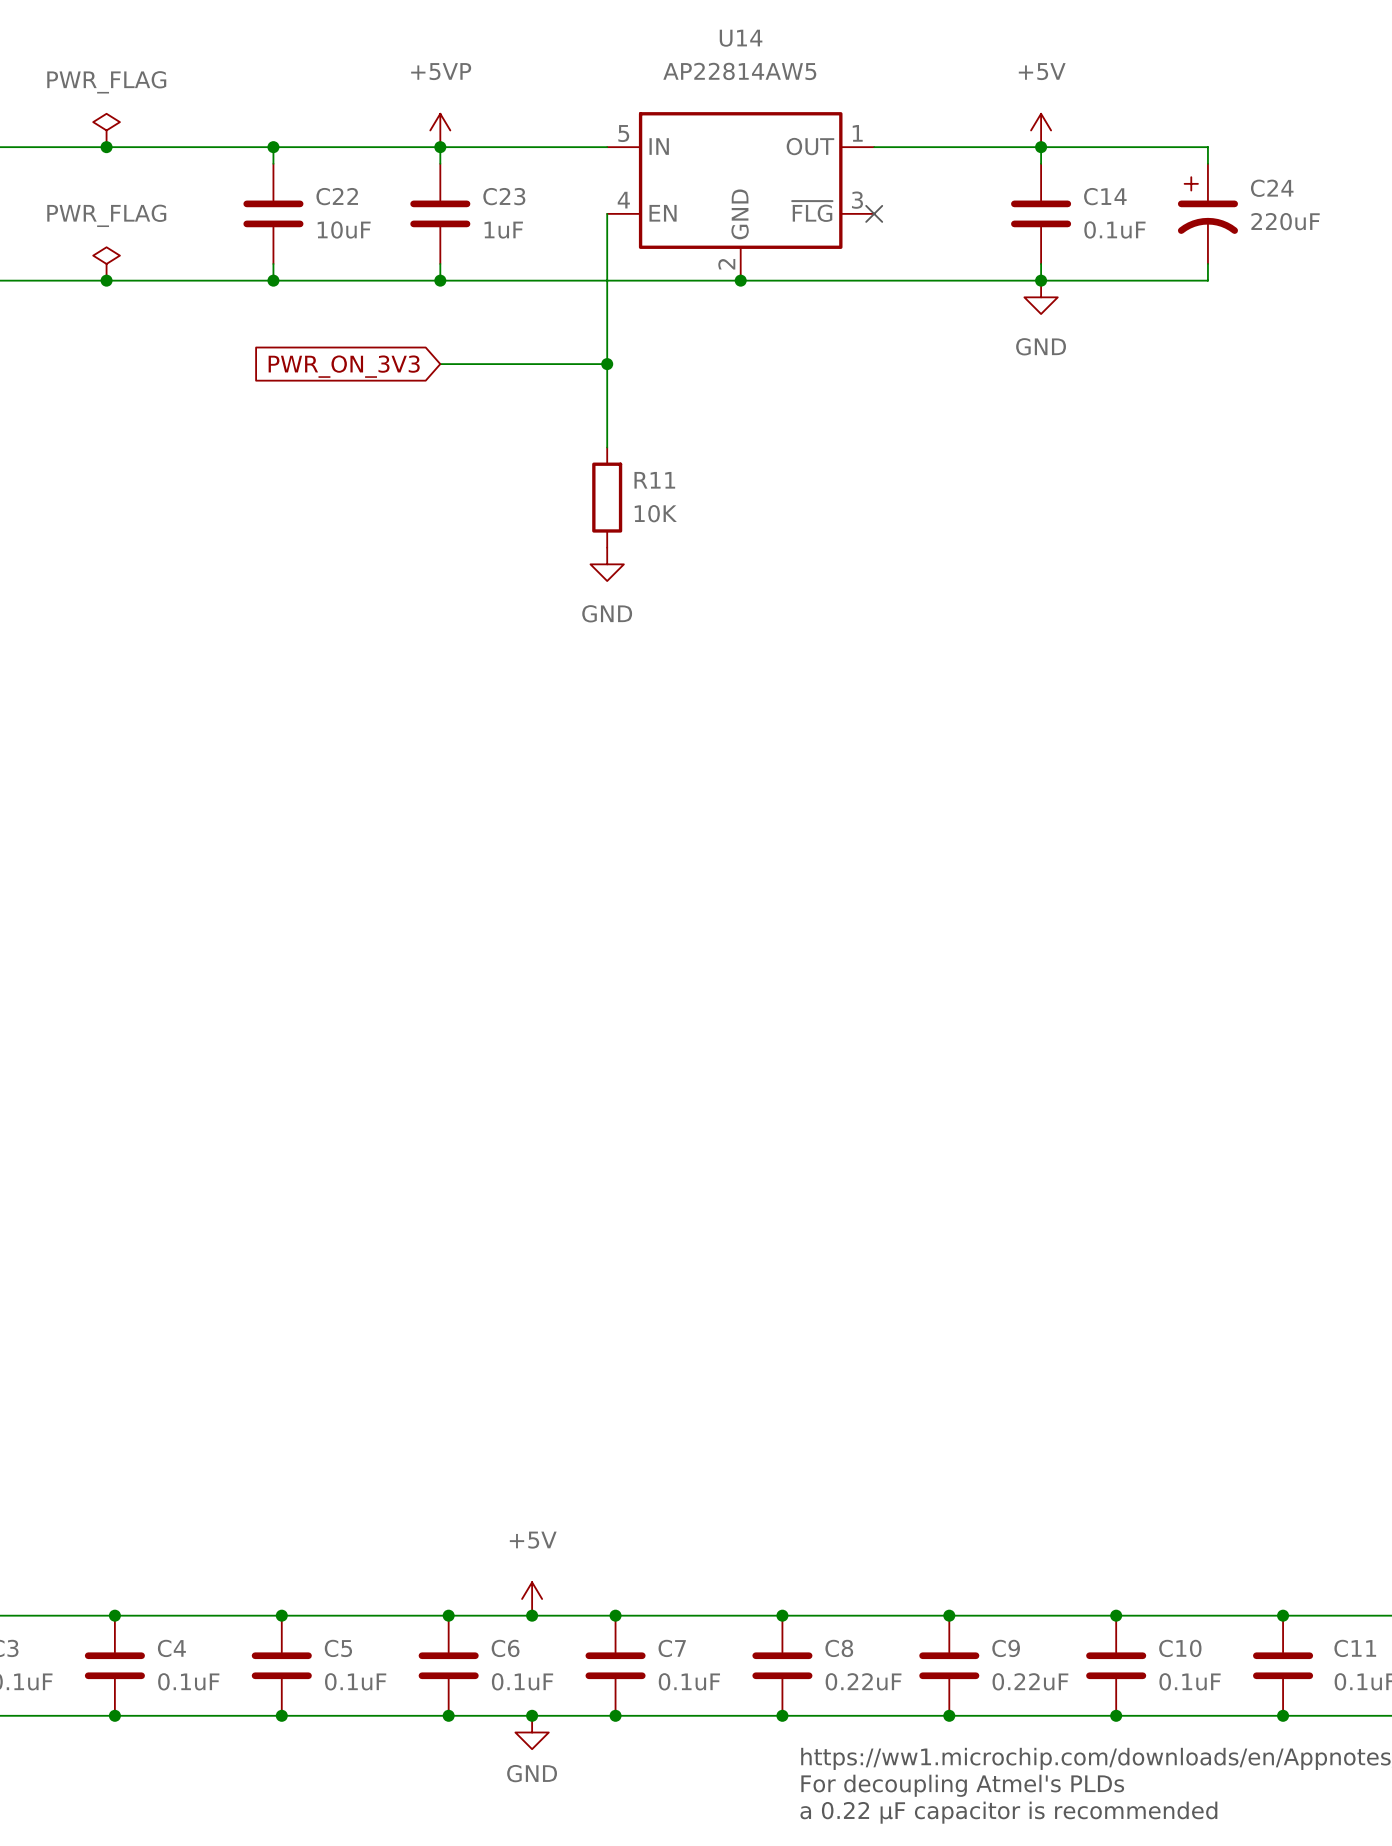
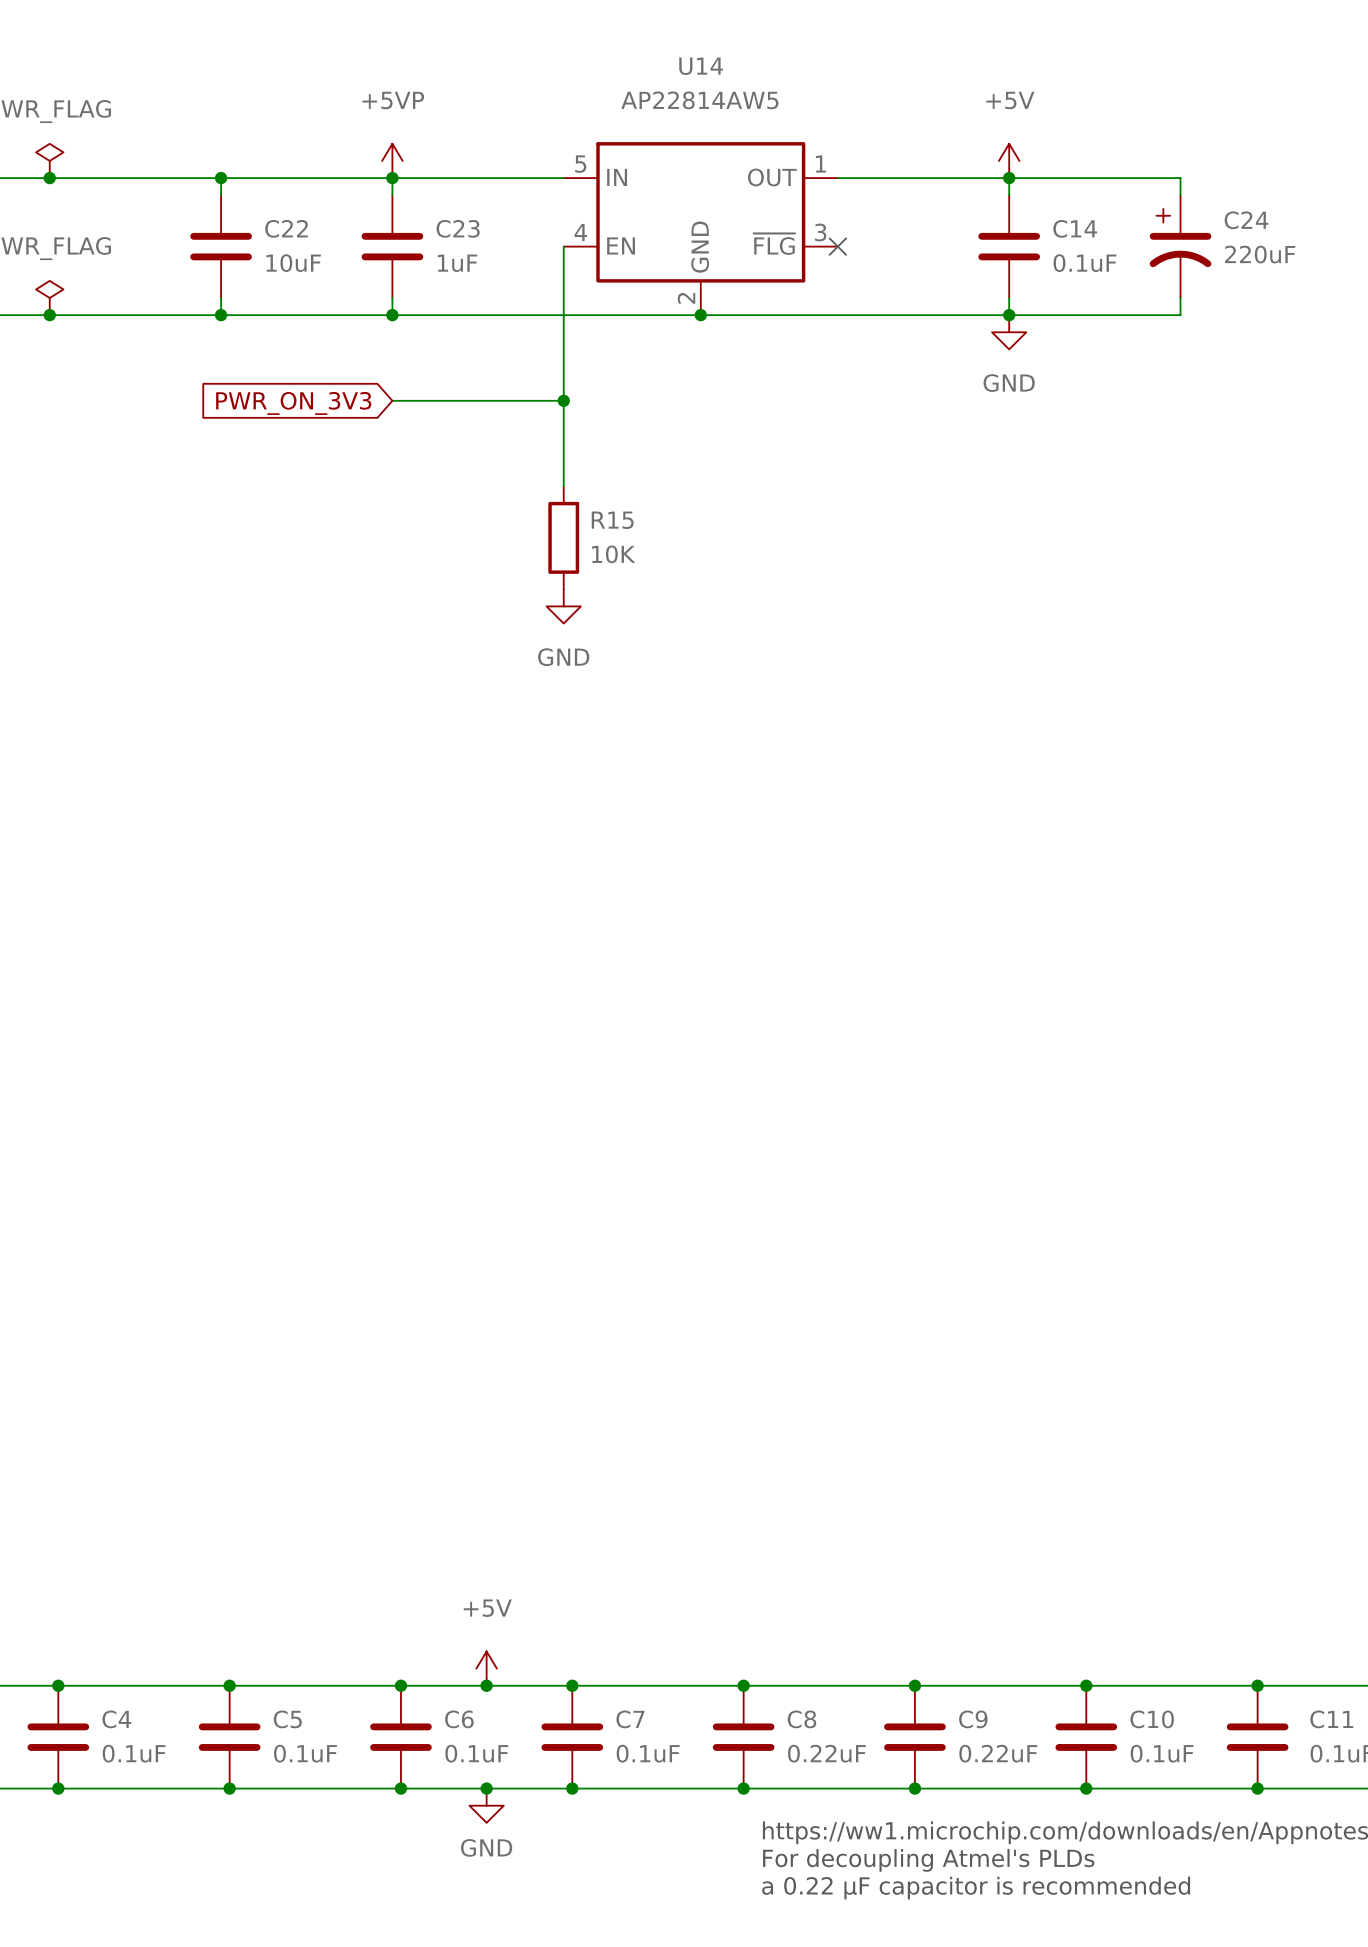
R11 name: R11 (654, 480) -> R15 (612, 520)

